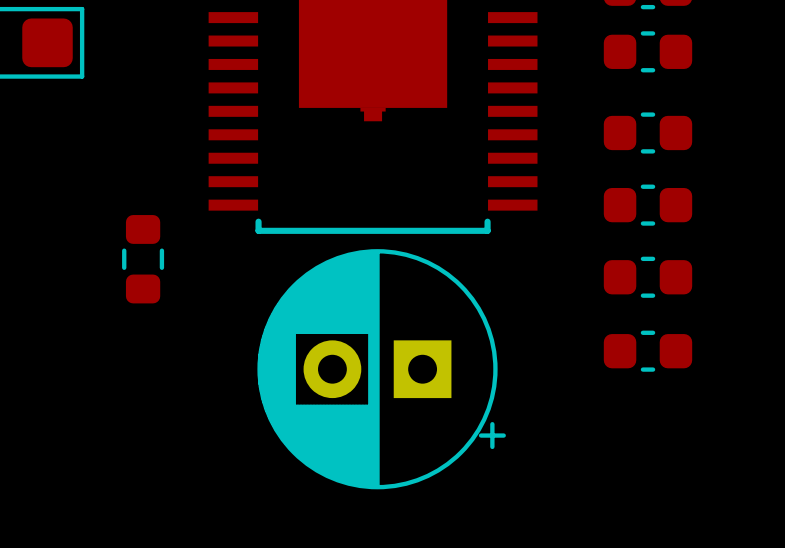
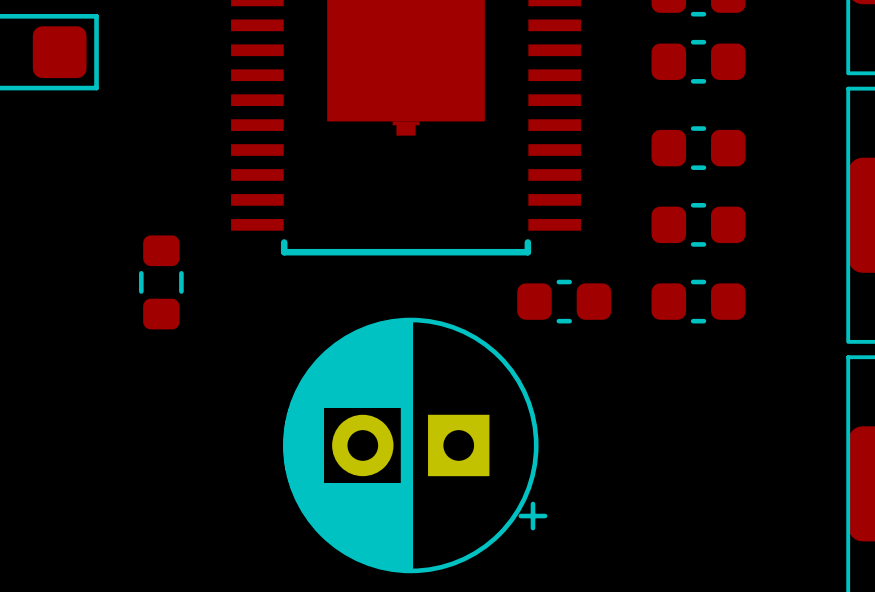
part position: (648, 351) -> (564, 301)
part position: (381, 369) -> (415, 445)

